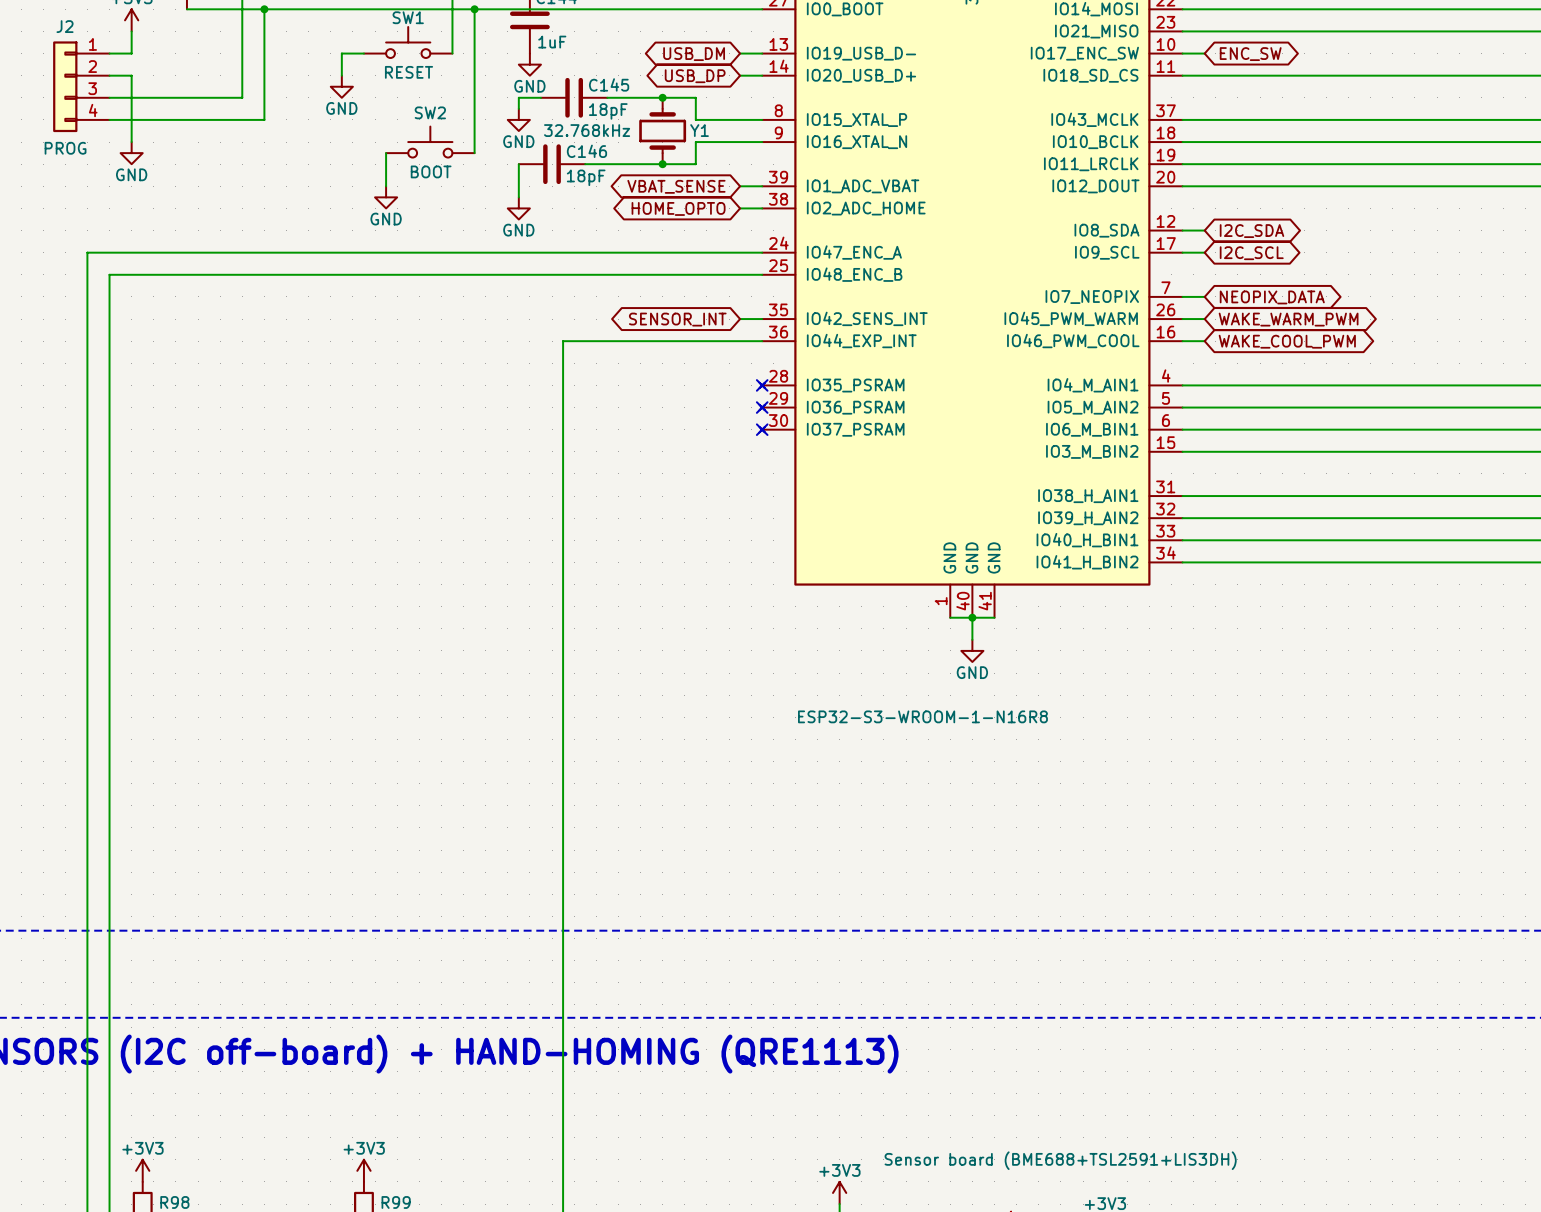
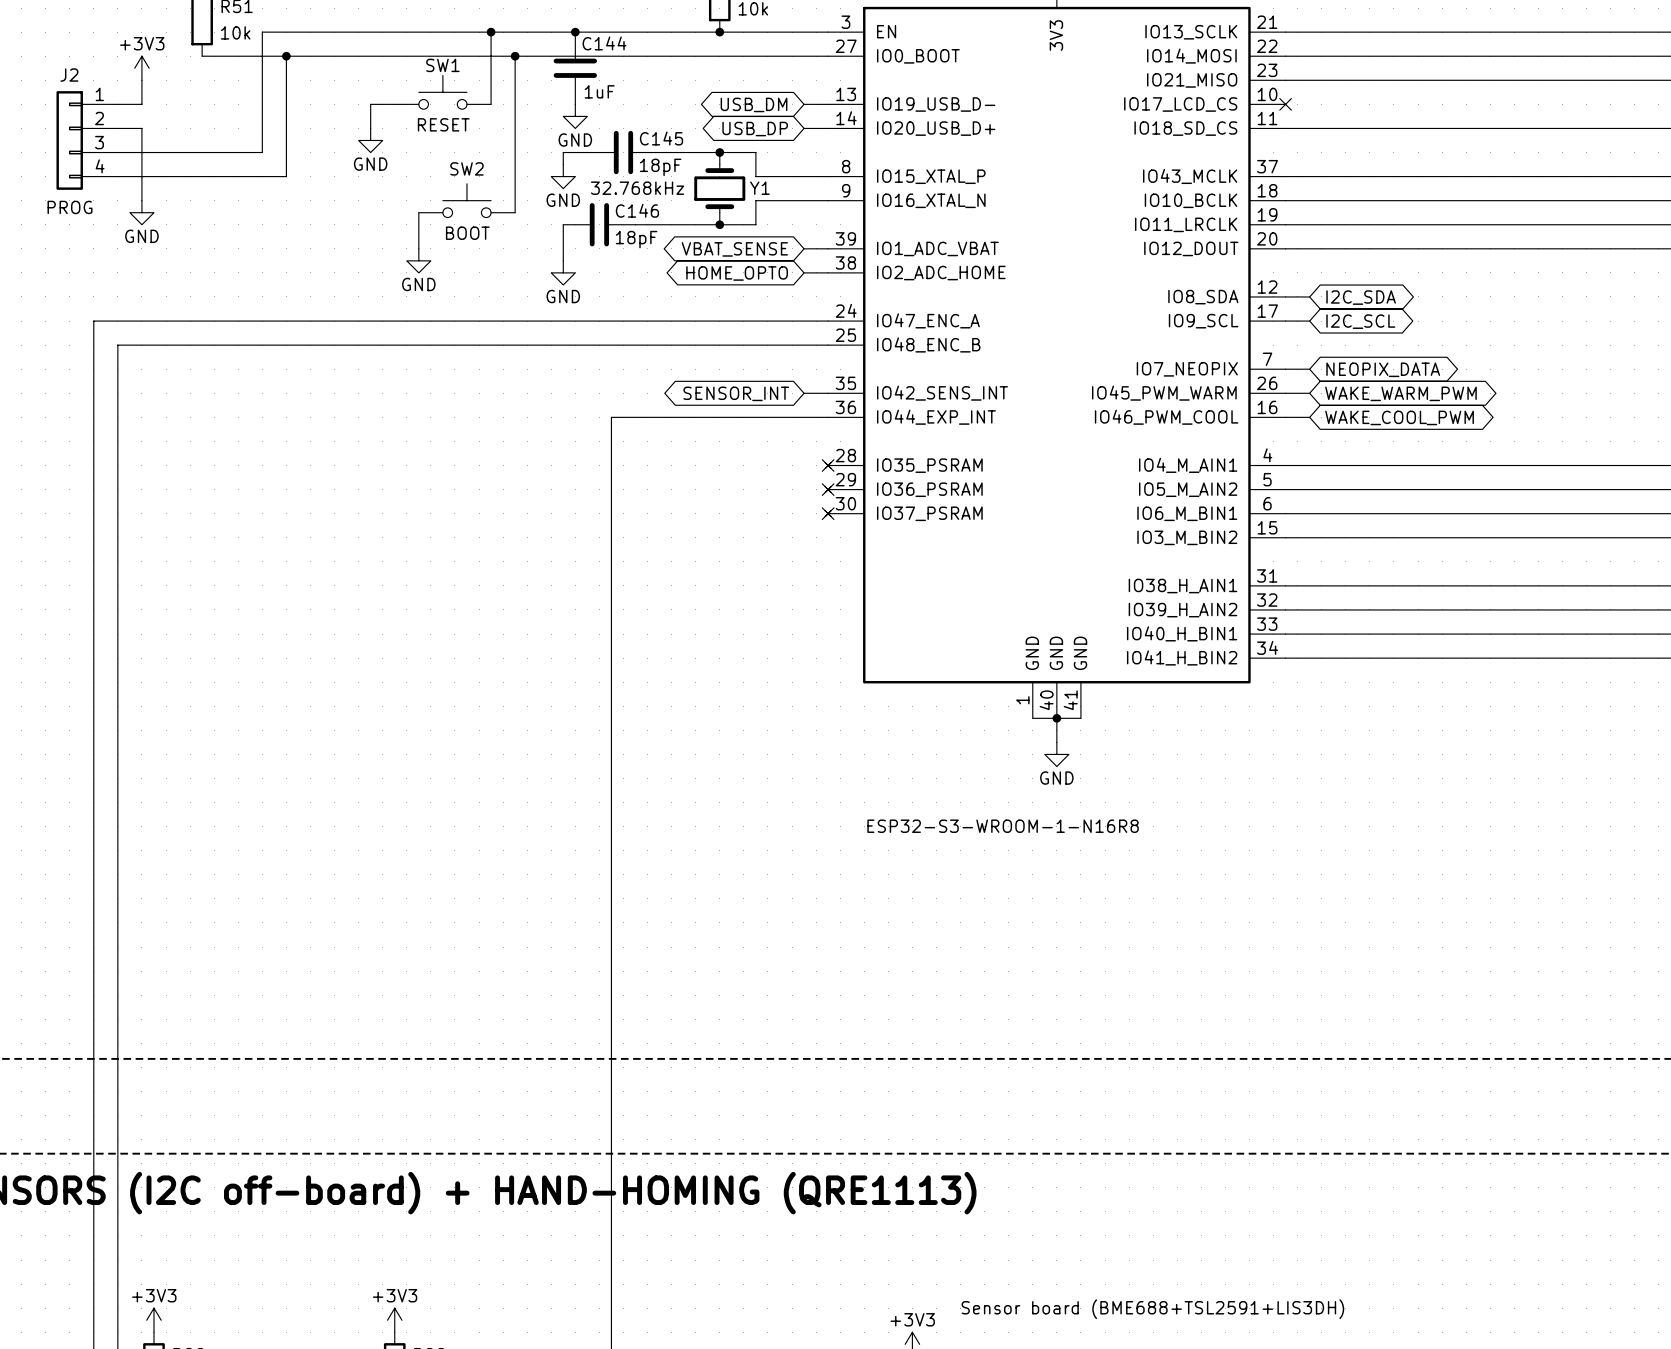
part pin name: IO17_ENC_SW (1084, 53) -> IO17_LCD_CS (1180, 104)
wire: (1182, 53) (1204, 53) -> none
no-connect mark: none -> (1285, 104)
global label: ENC_SW (1250, 54) -> none

